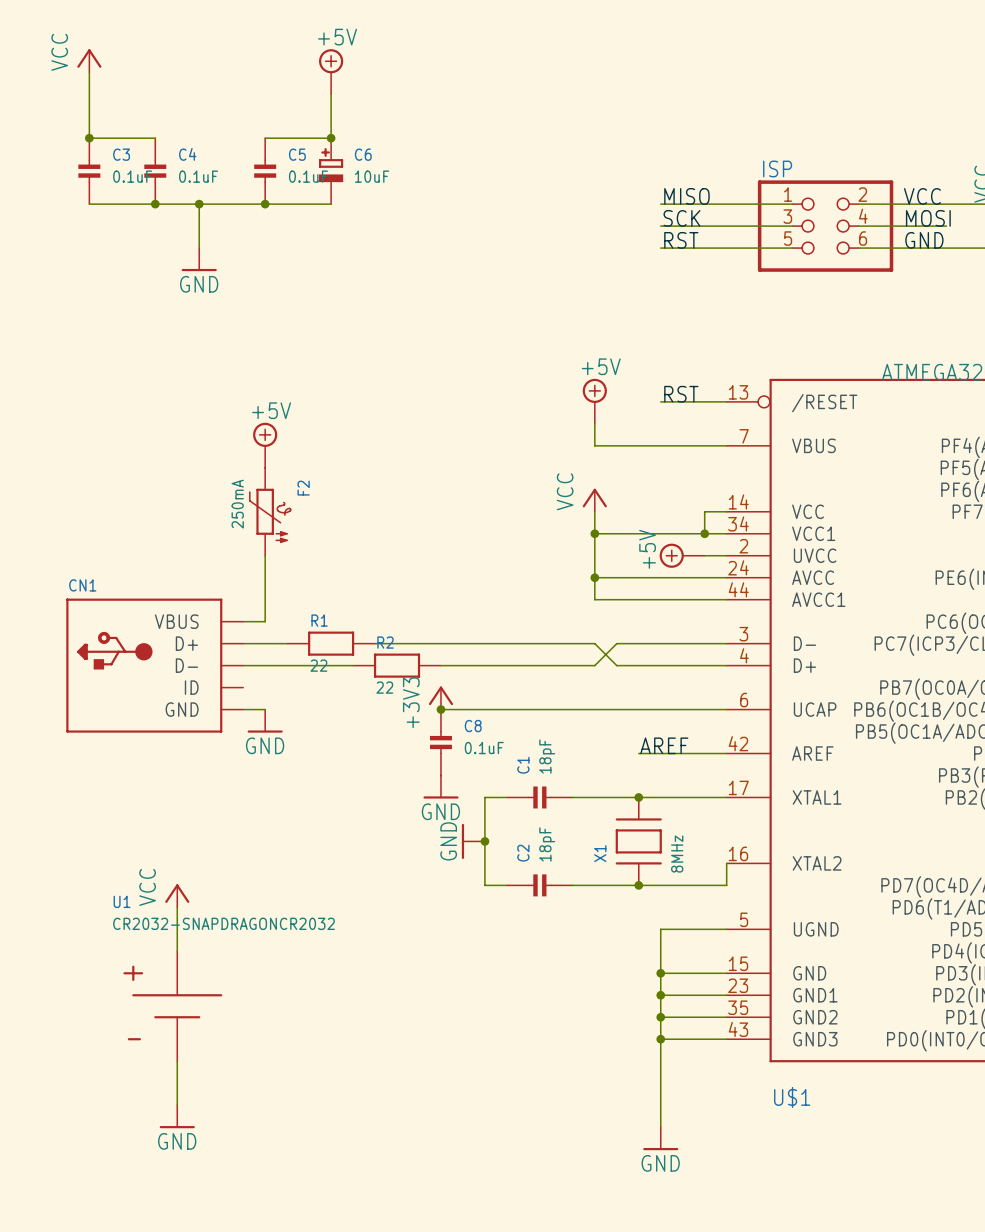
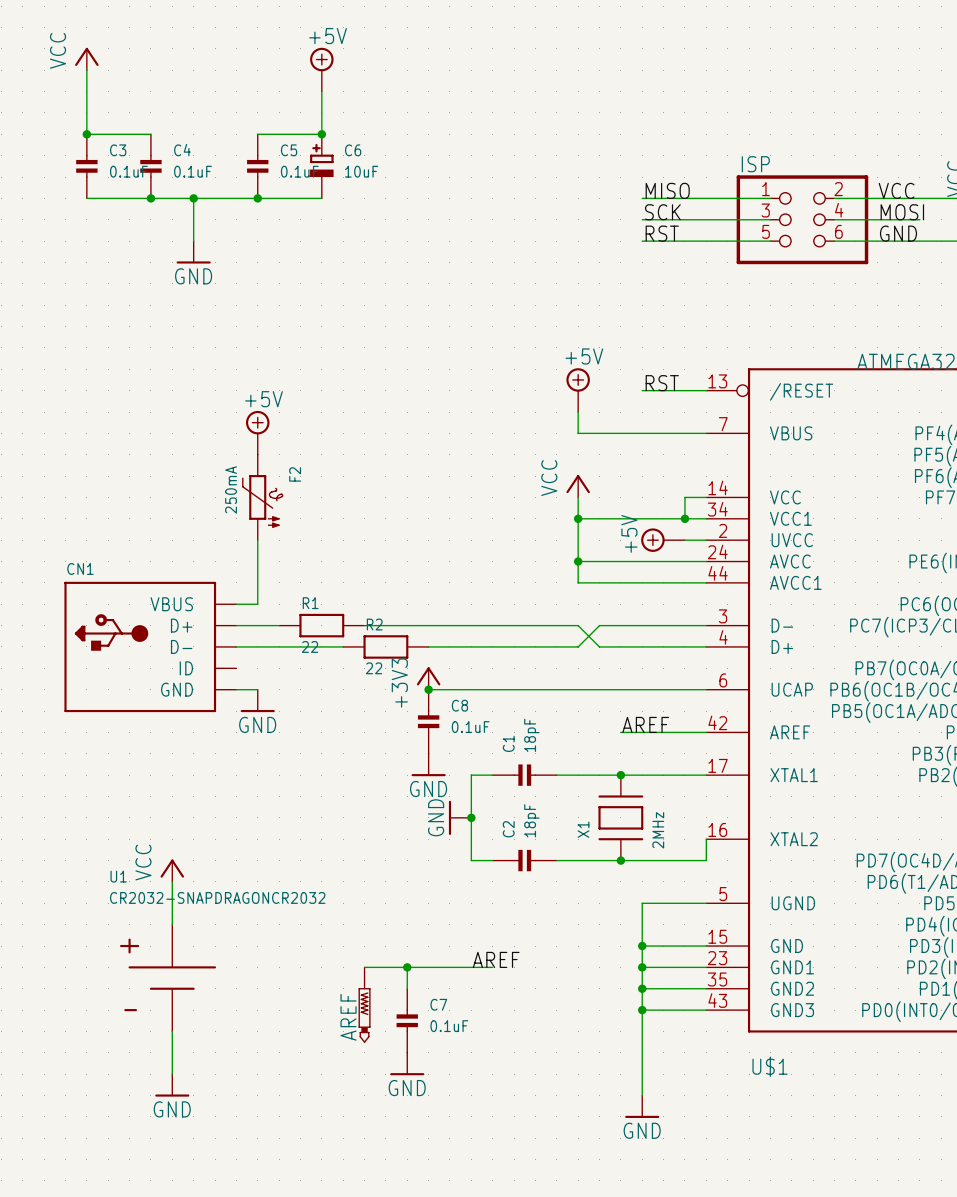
X1 value: 8MHz (677, 854) -> 2MHz (658, 830)
label: none -> AREF (496, 959)
wire: none -> (364, 967) (492, 967)
wire: none -> (407, 967) (407, 988)
junction: none -> (407, 967)
AREF: none -> (364, 1005)
C7: none -> 0.1uF (407, 1020)
power symbol: none -> GND (407, 1064)

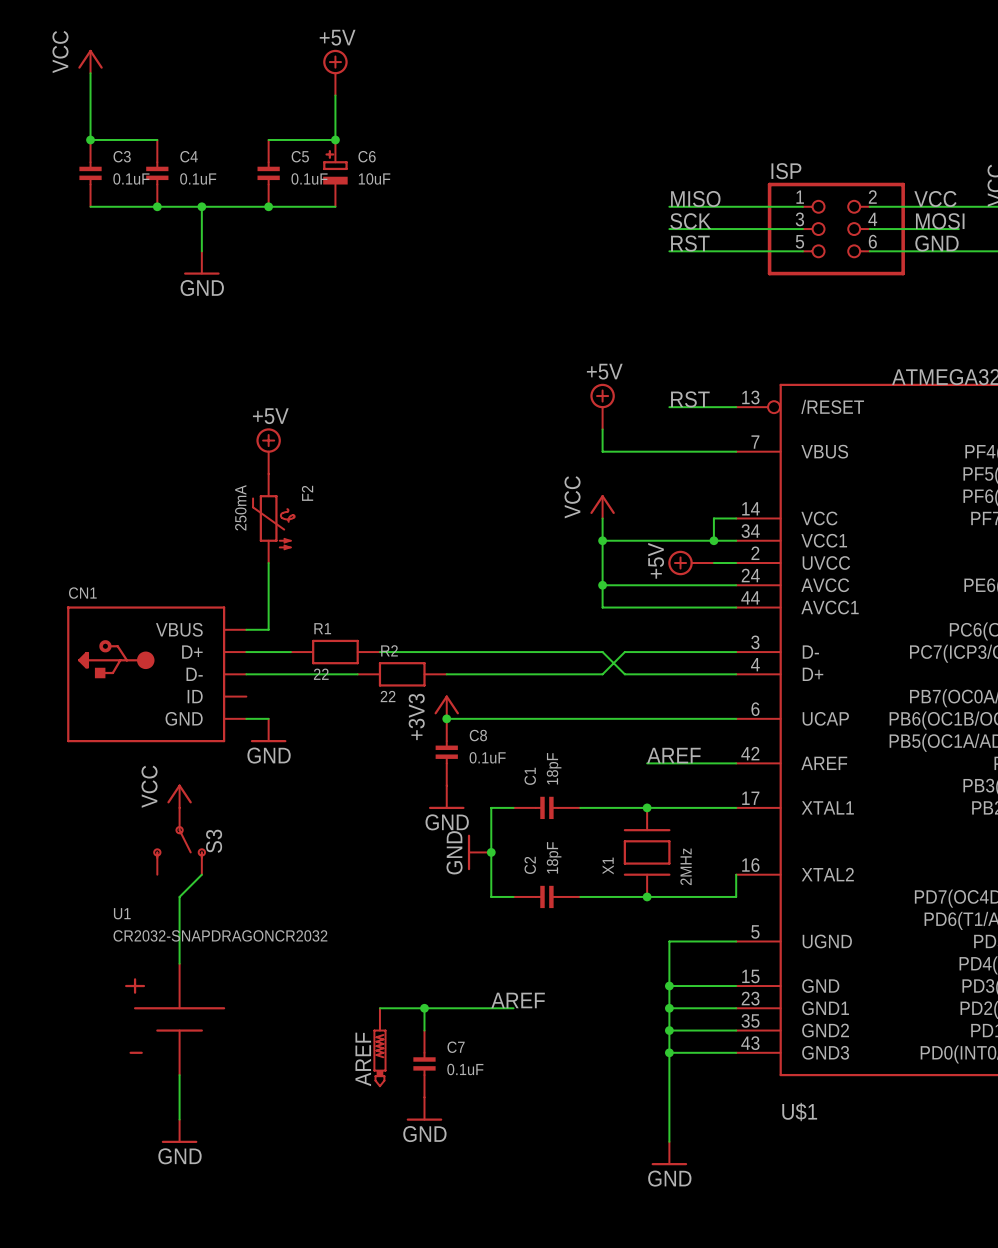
S3: none -> (179, 841)
wire: none -> (201, 874) (179, 896) (179, 919)
power symbol position: VCC (172, 870) -> VCC (179, 796)

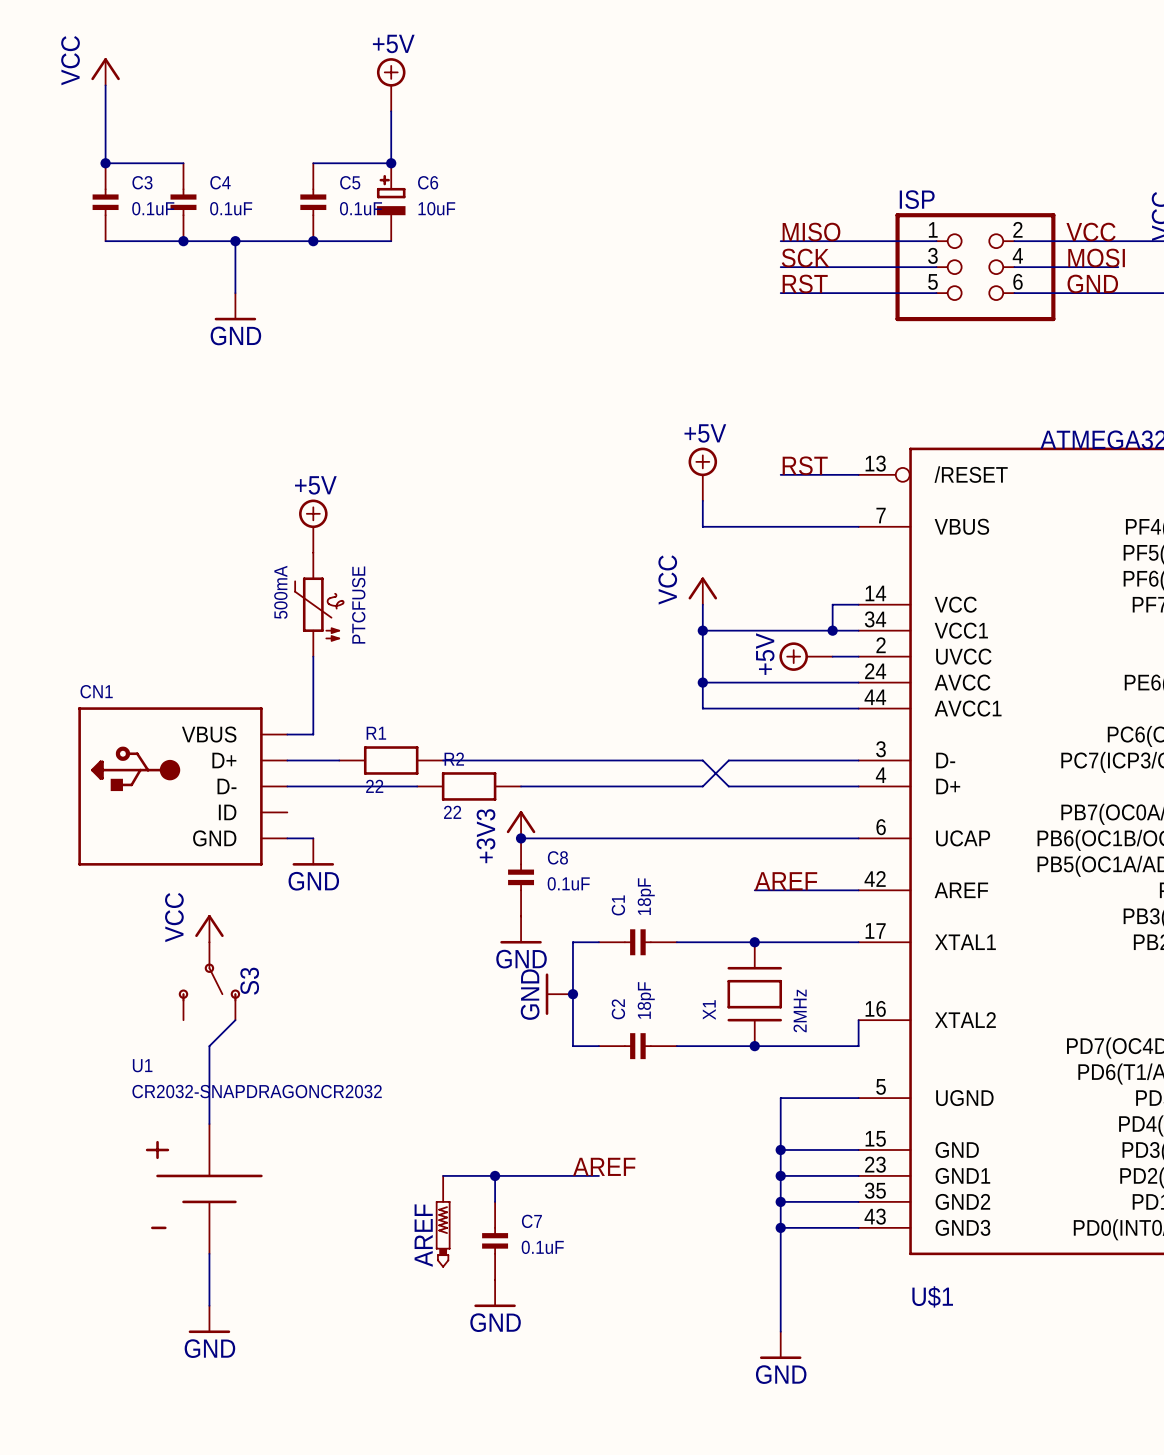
F2 name: F2 (307, 493) -> PTCFUSE (358, 605)
F2 value: 250mA (240, 507) -> 500mA (280, 592)

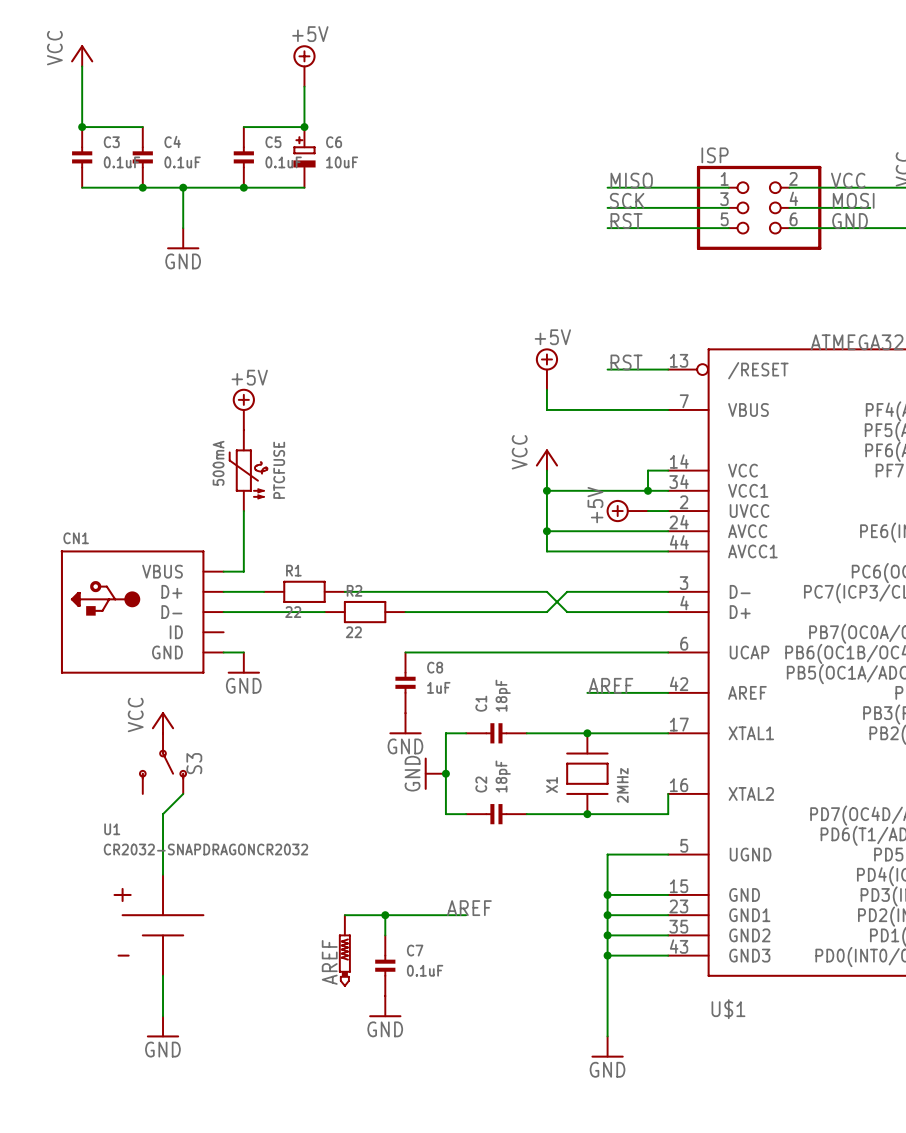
power symbol: +3V3 (521, 824) -> none
junction: (521, 838) -> none
C8 value: 0.1uF (568, 883) -> 1uF (438, 687)

